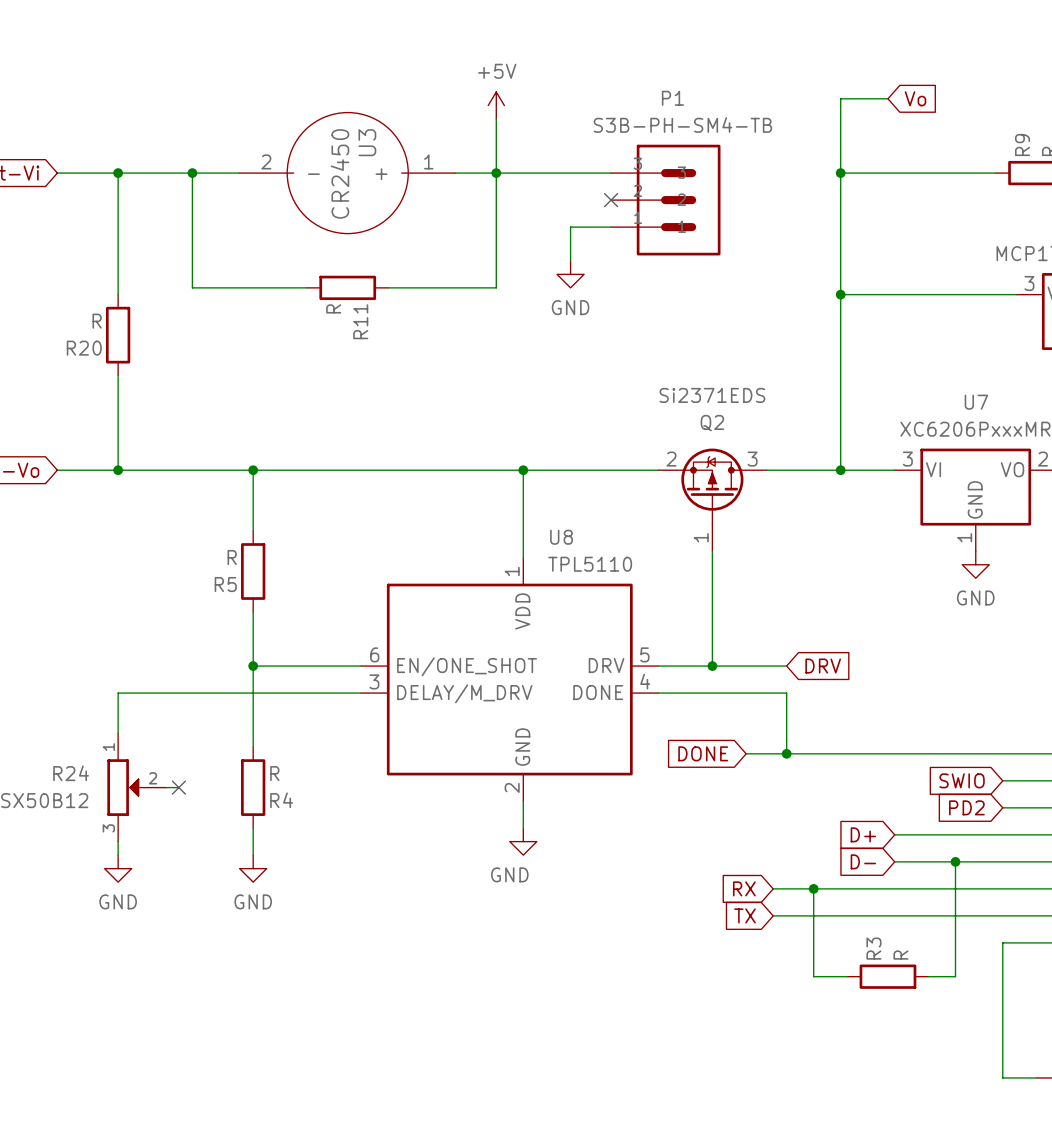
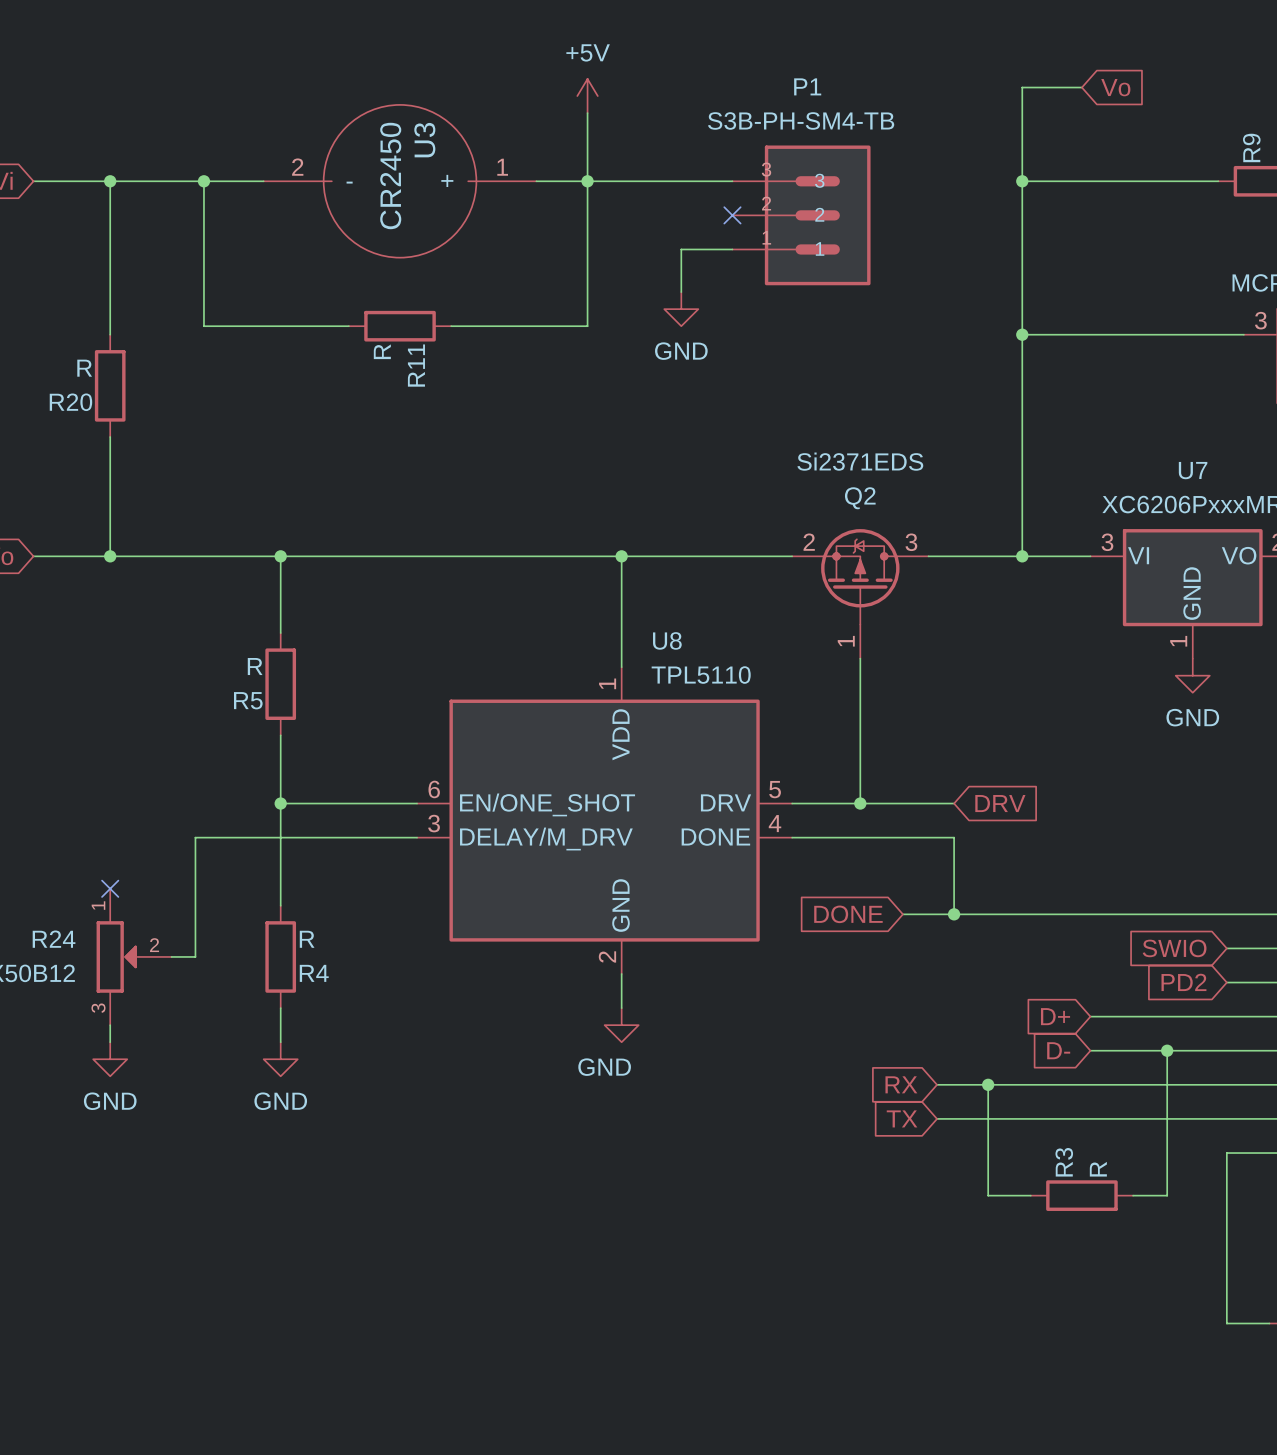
wire: (185, 693) (118, 693) (118, 733) -> (195, 837) (195, 956) (186, 956)
no-connect mark: none -> (110, 888)
no-connect mark: (178, 787) -> none

